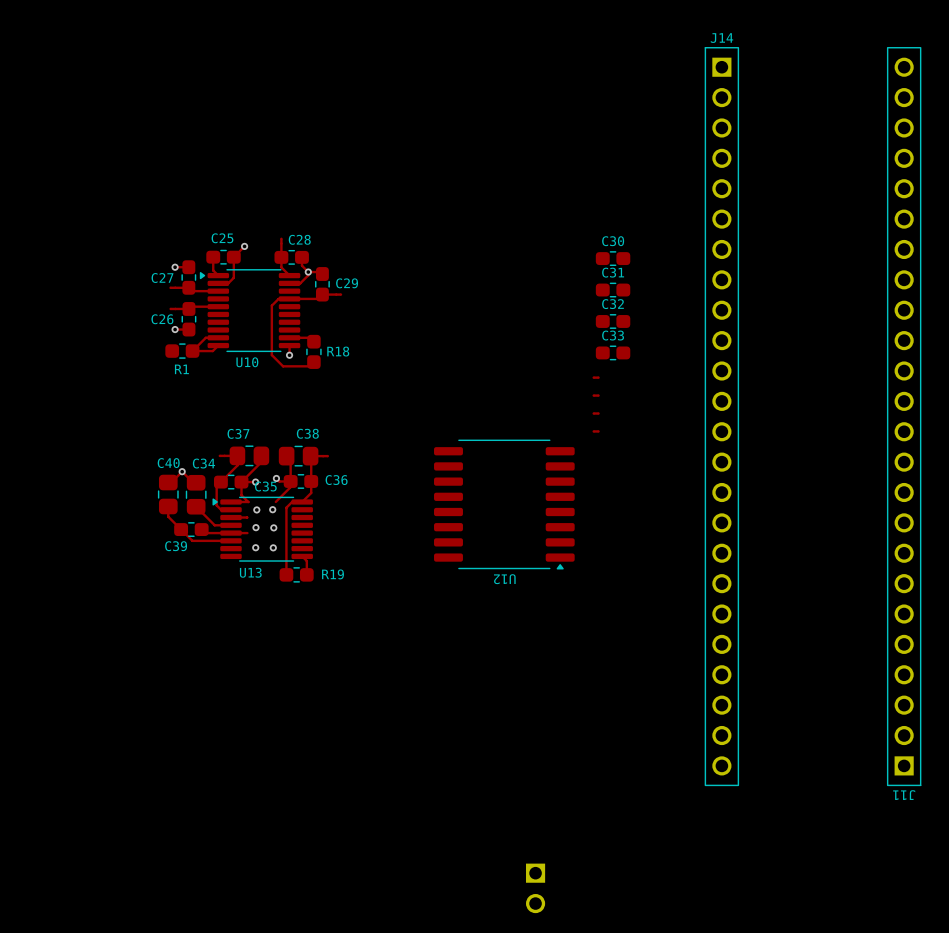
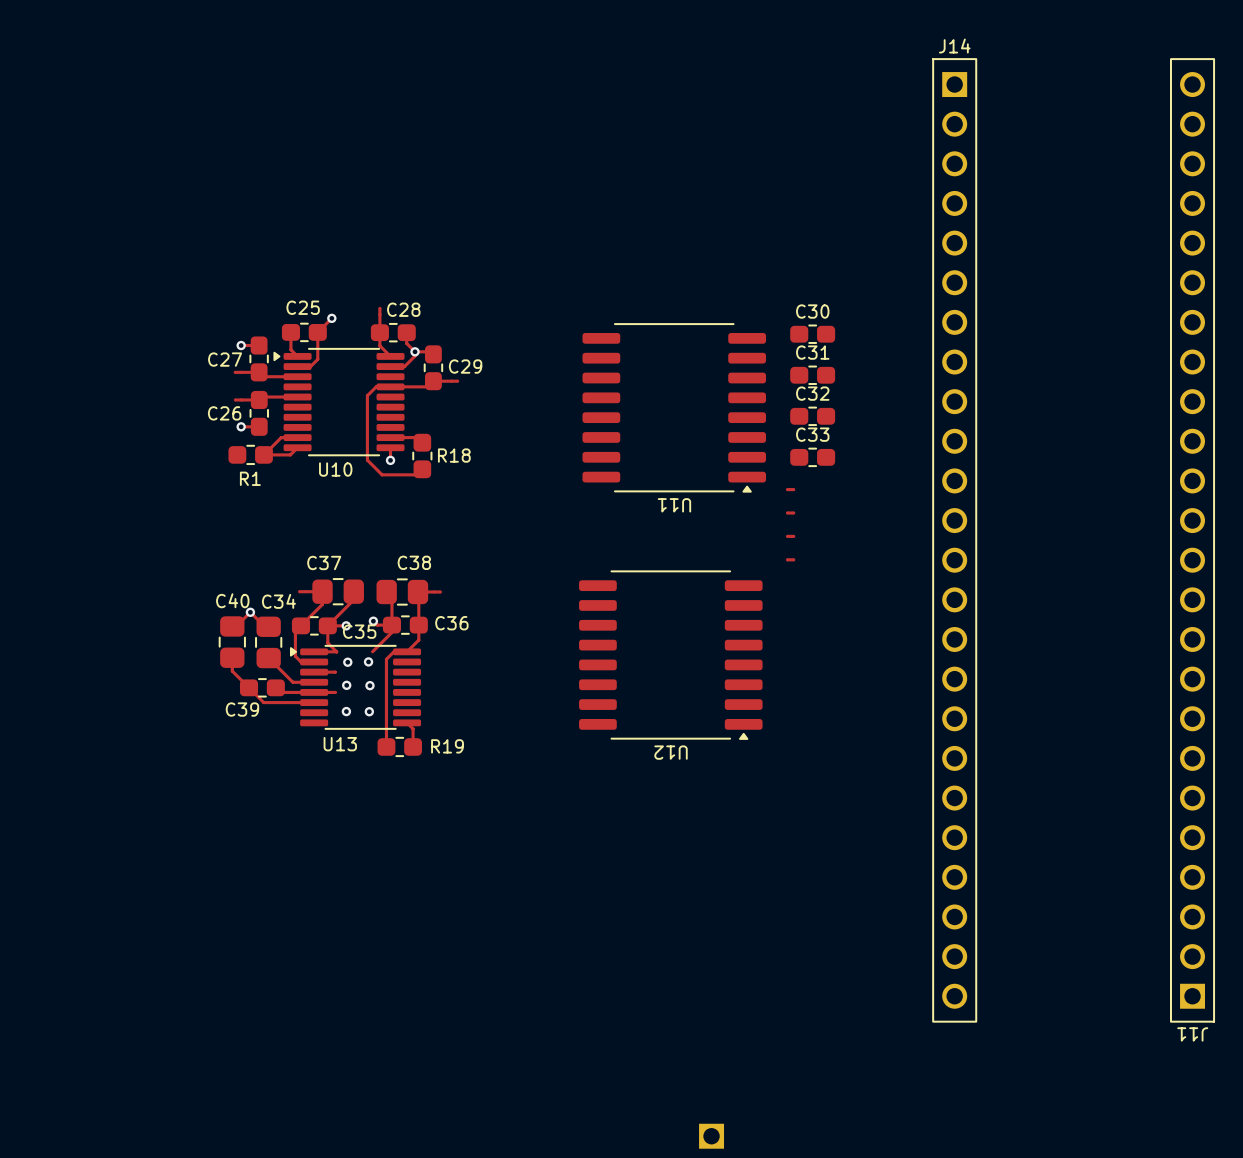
U11: none -> (674, 407)

